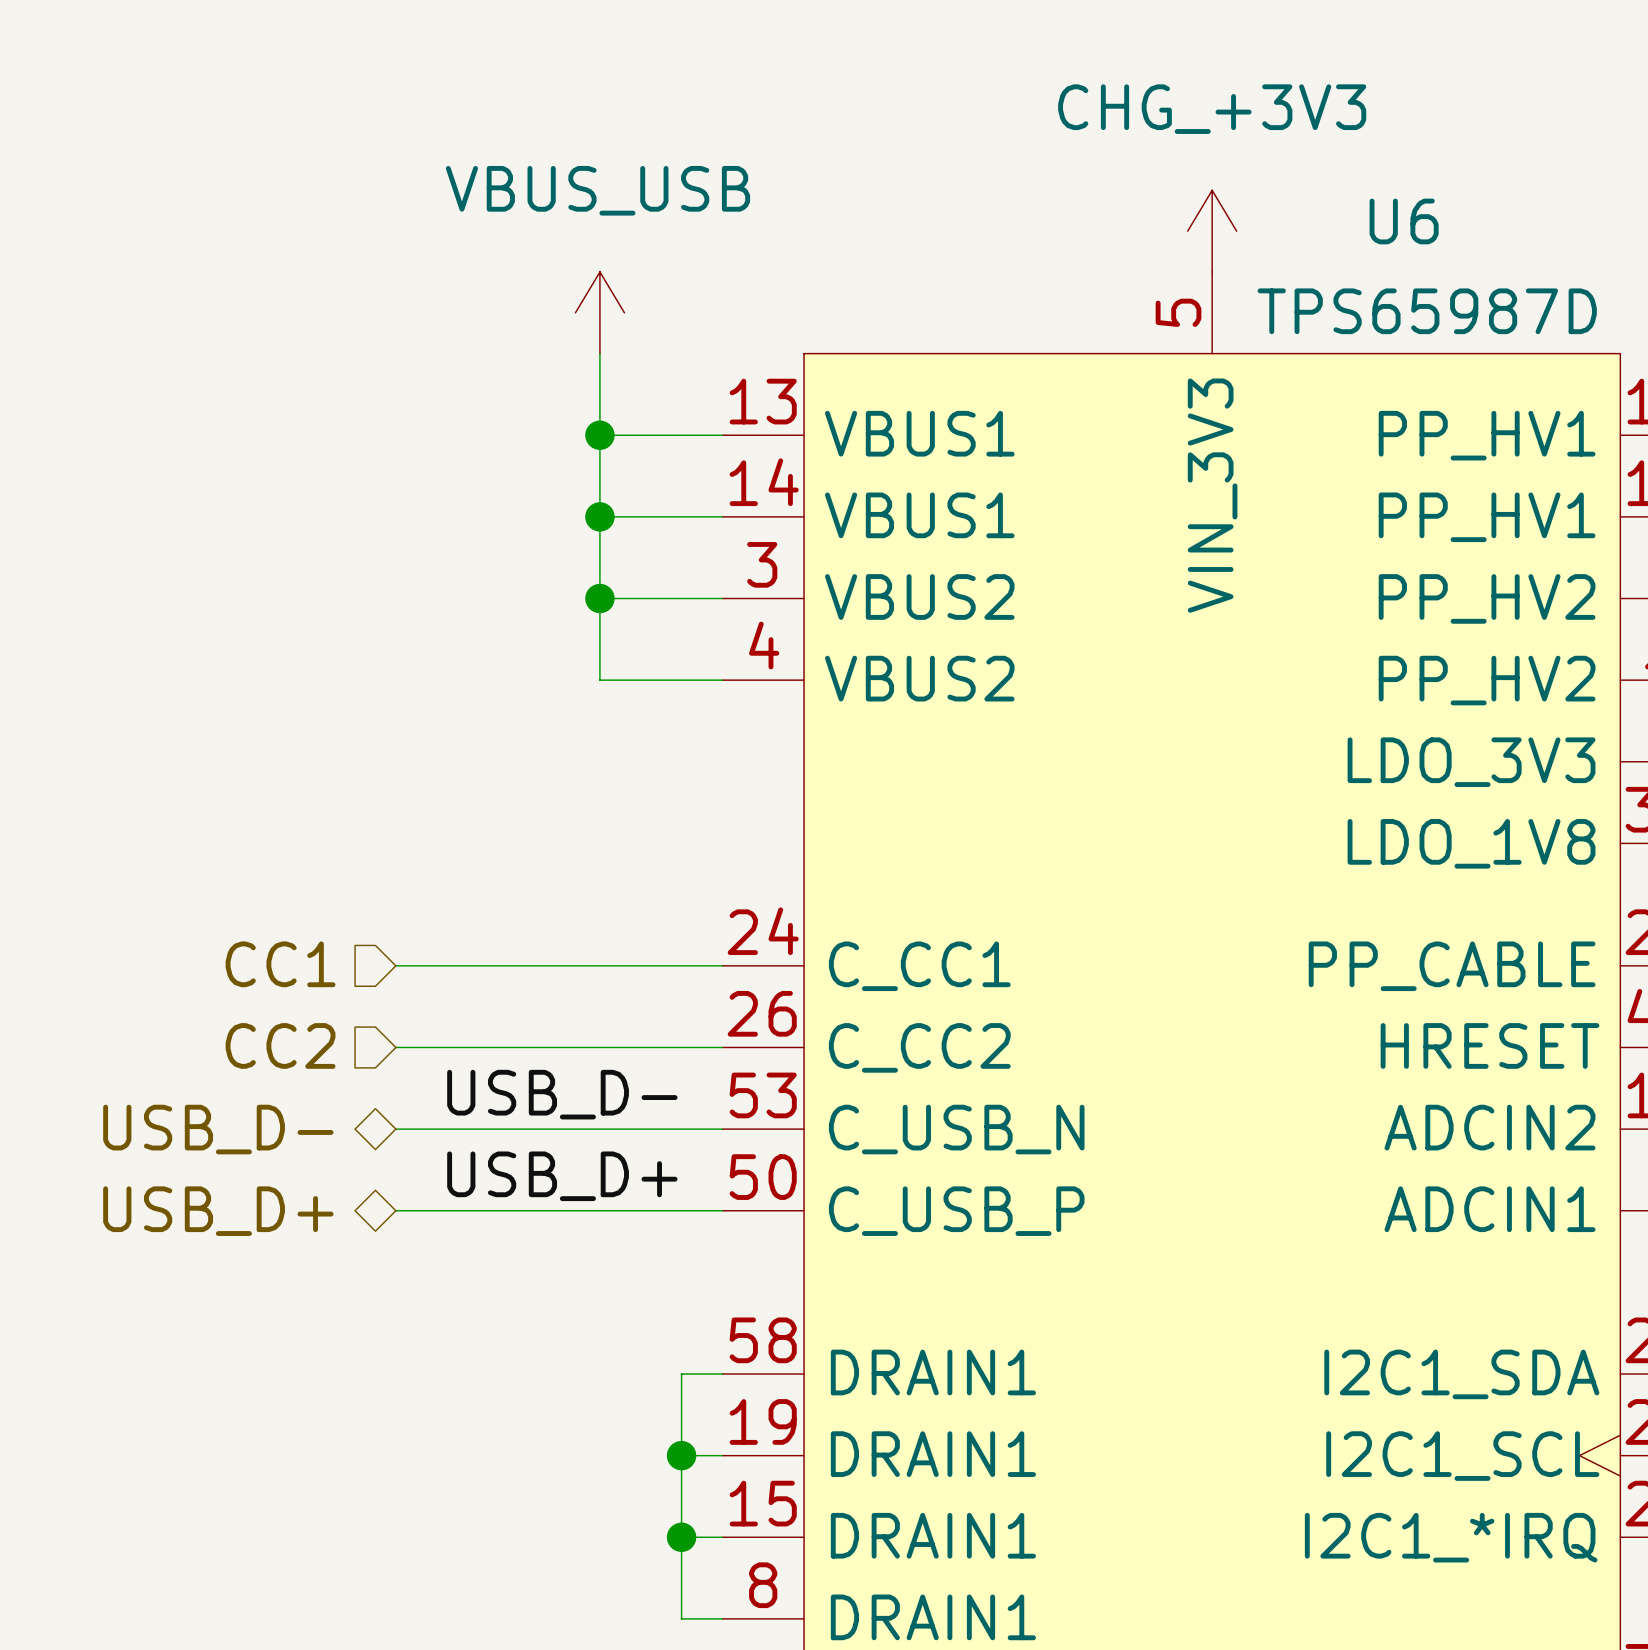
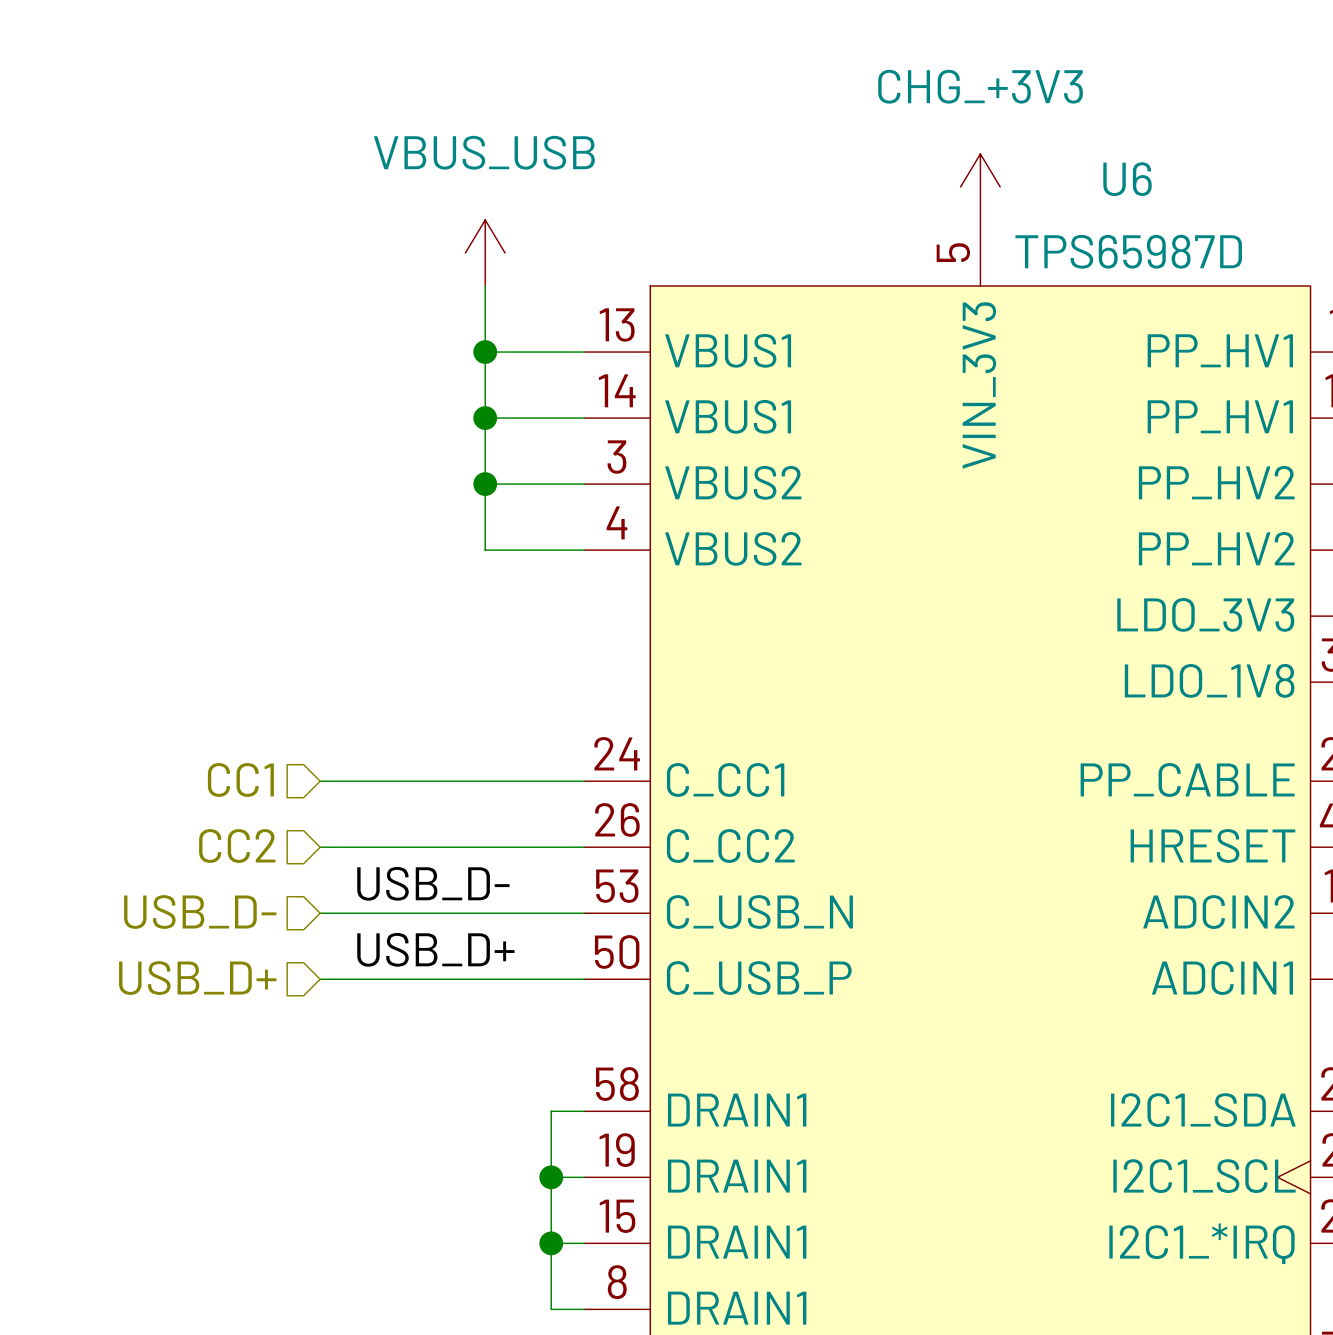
hierarchical label shape: bidirectional (218, 1129) -> input (200, 912)
hierarchical label shape: bidirectional (218, 1211) -> input (197, 978)

